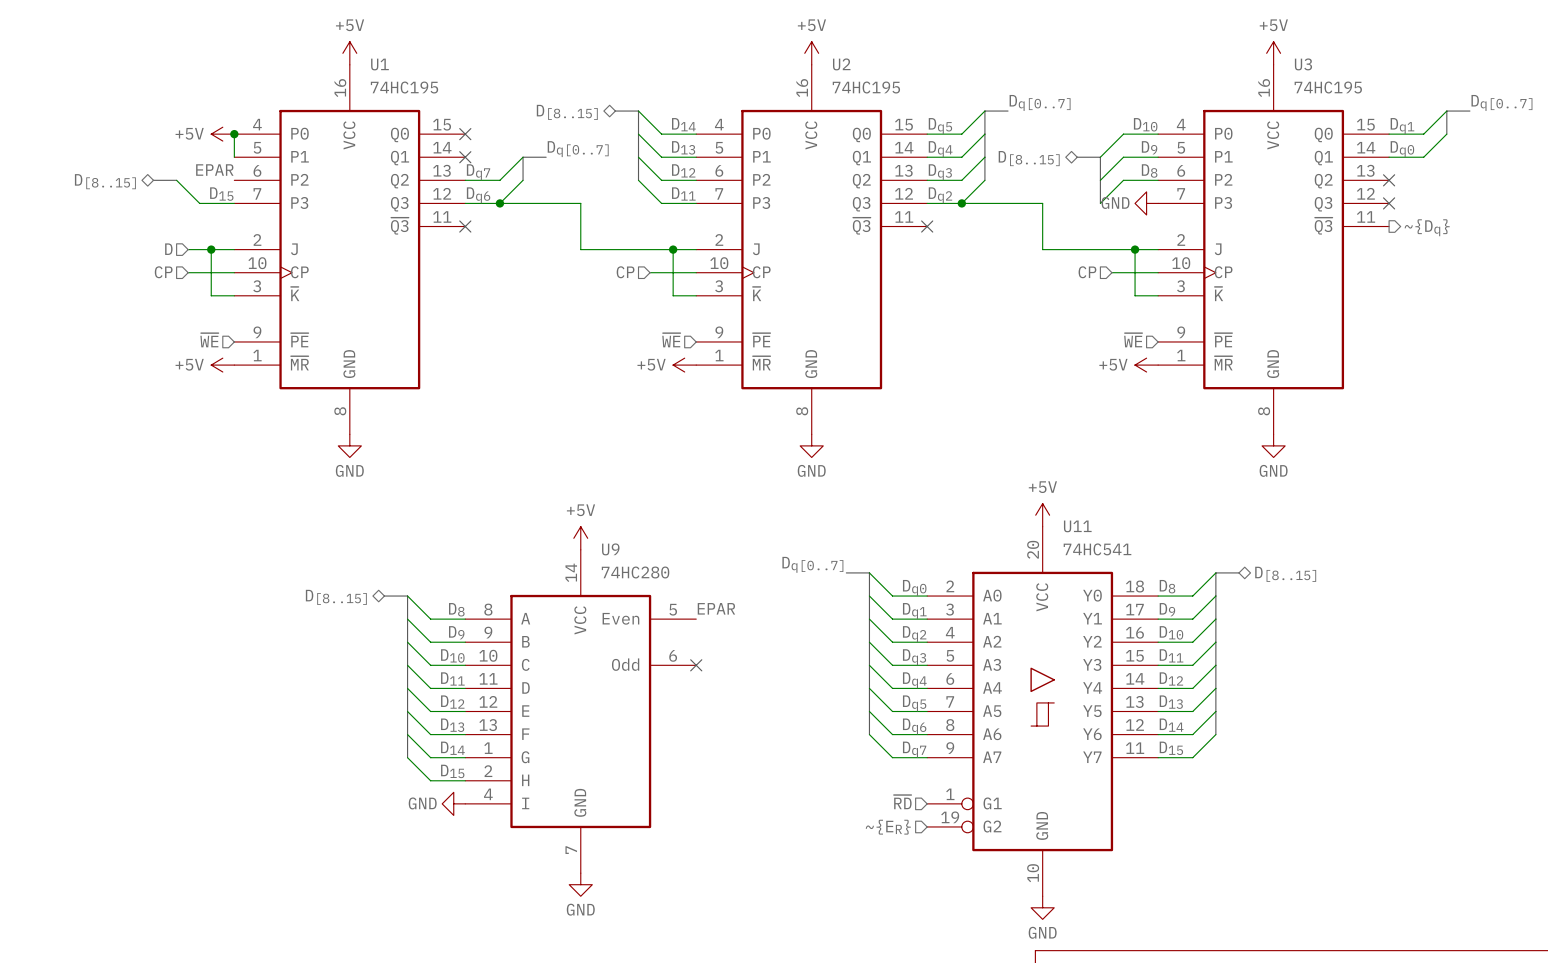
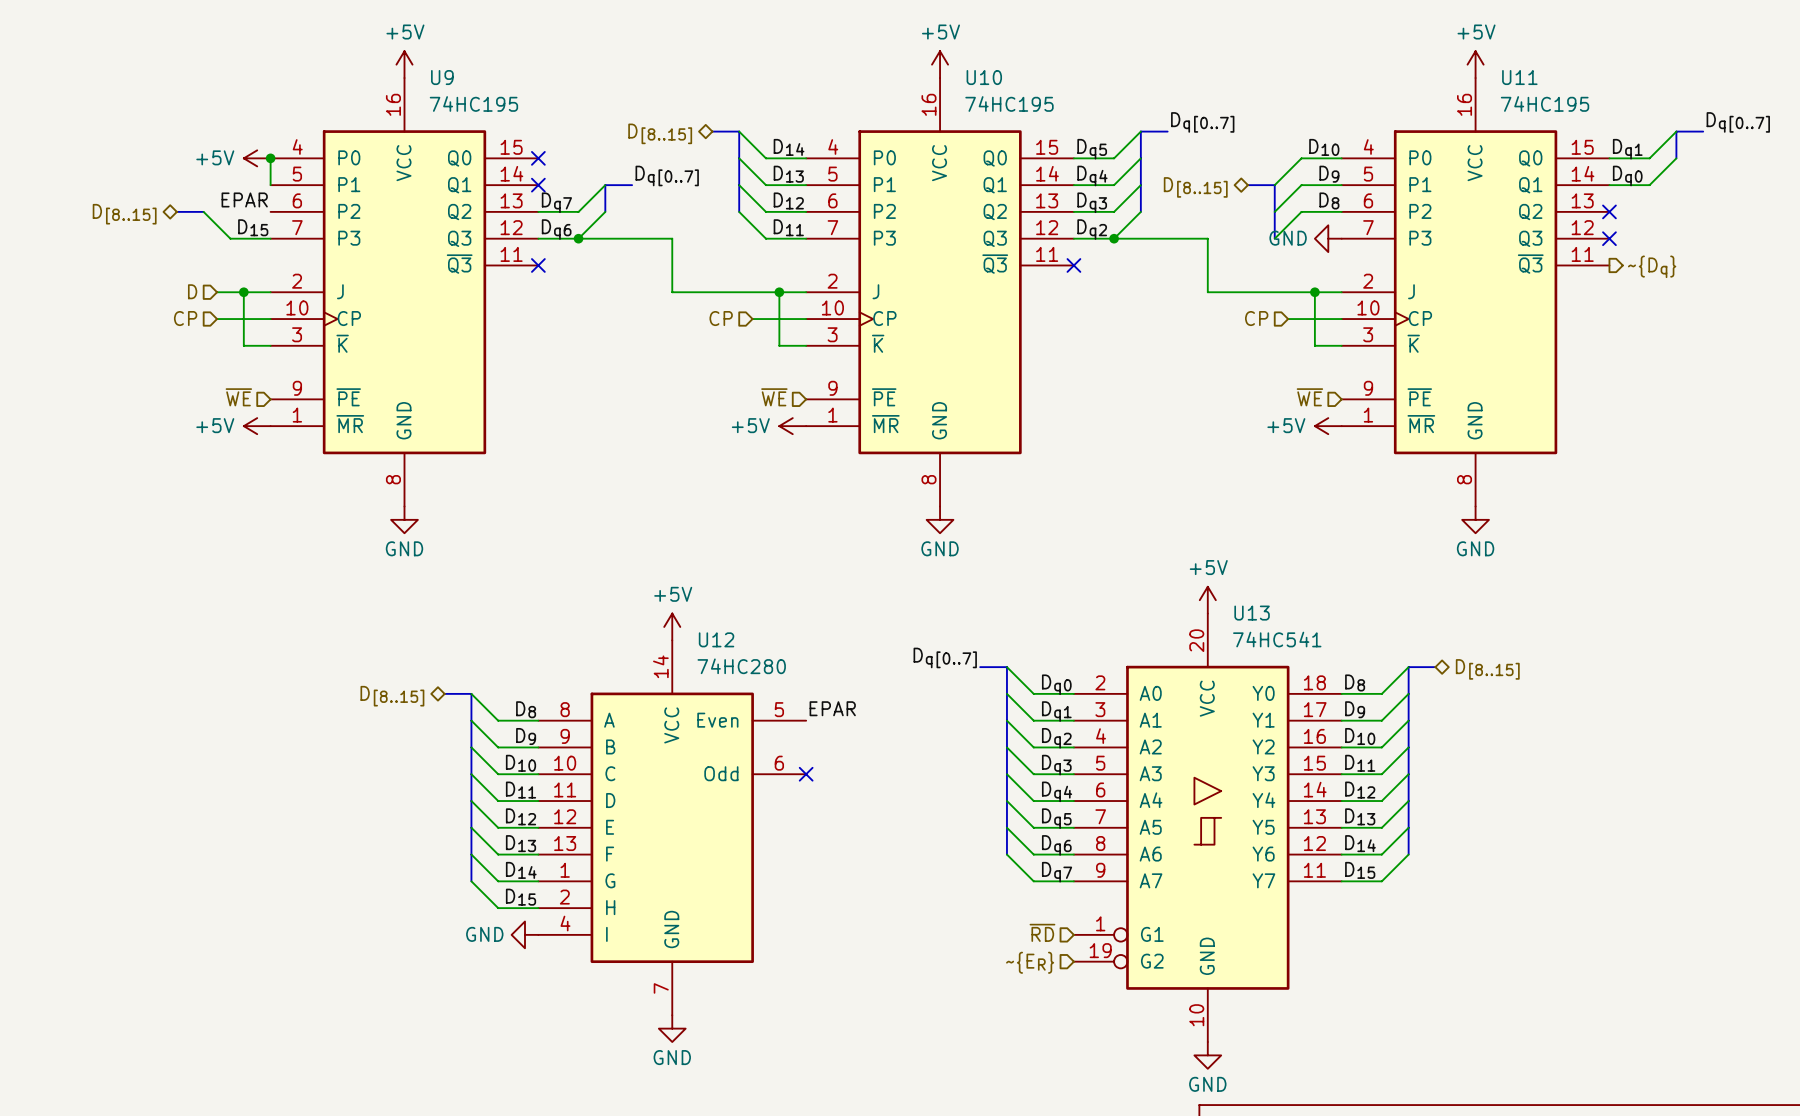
U1 name: U1 (379, 64) -> U9 (442, 77)
U2 name: U2 (841, 64) -> U10 (984, 77)
U3 name: U3 (1303, 64) -> U11 (1519, 77)
U11 name: U11 (1077, 526) -> U13 (1252, 613)
U9 name: U9 (610, 549) -> U12 (716, 639)

